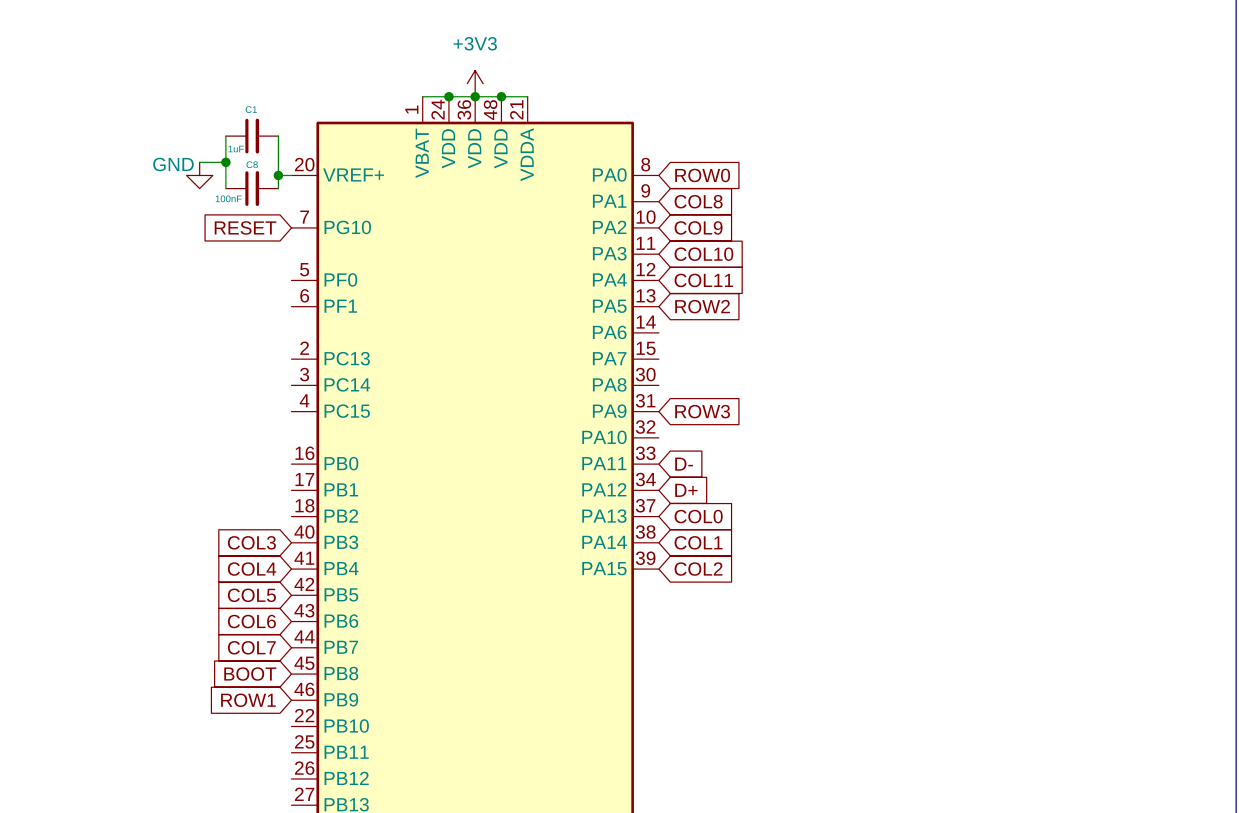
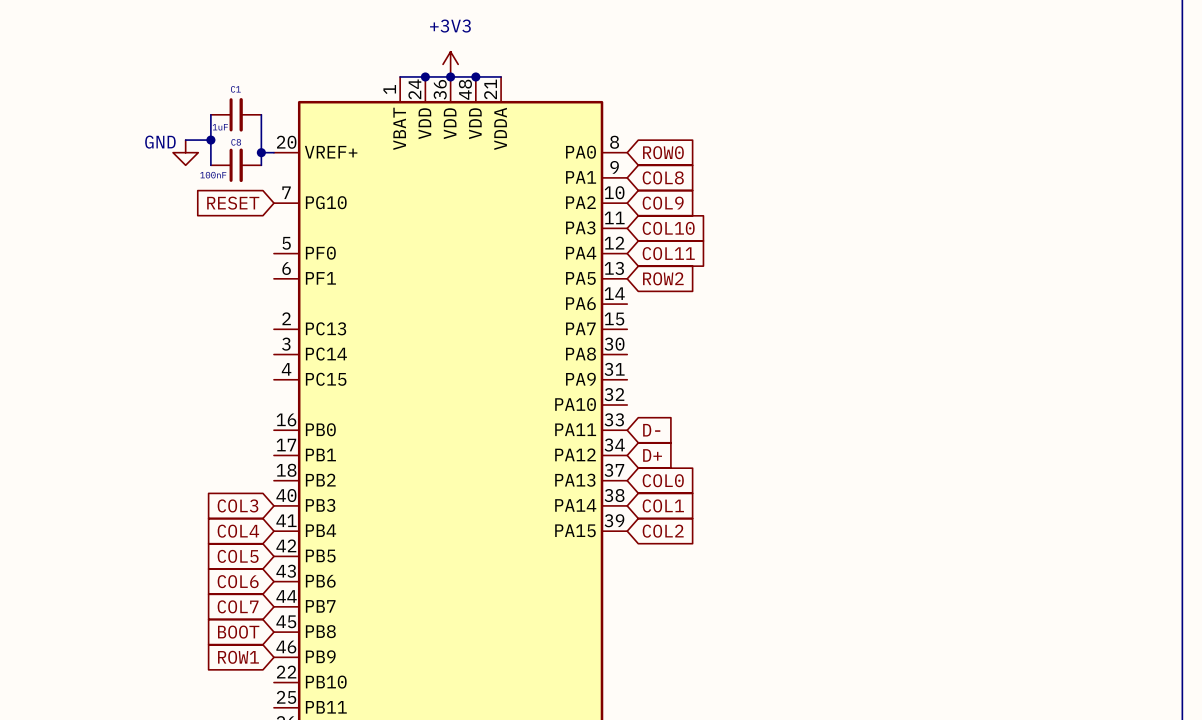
global label: ROW3 (702, 411) -> none

